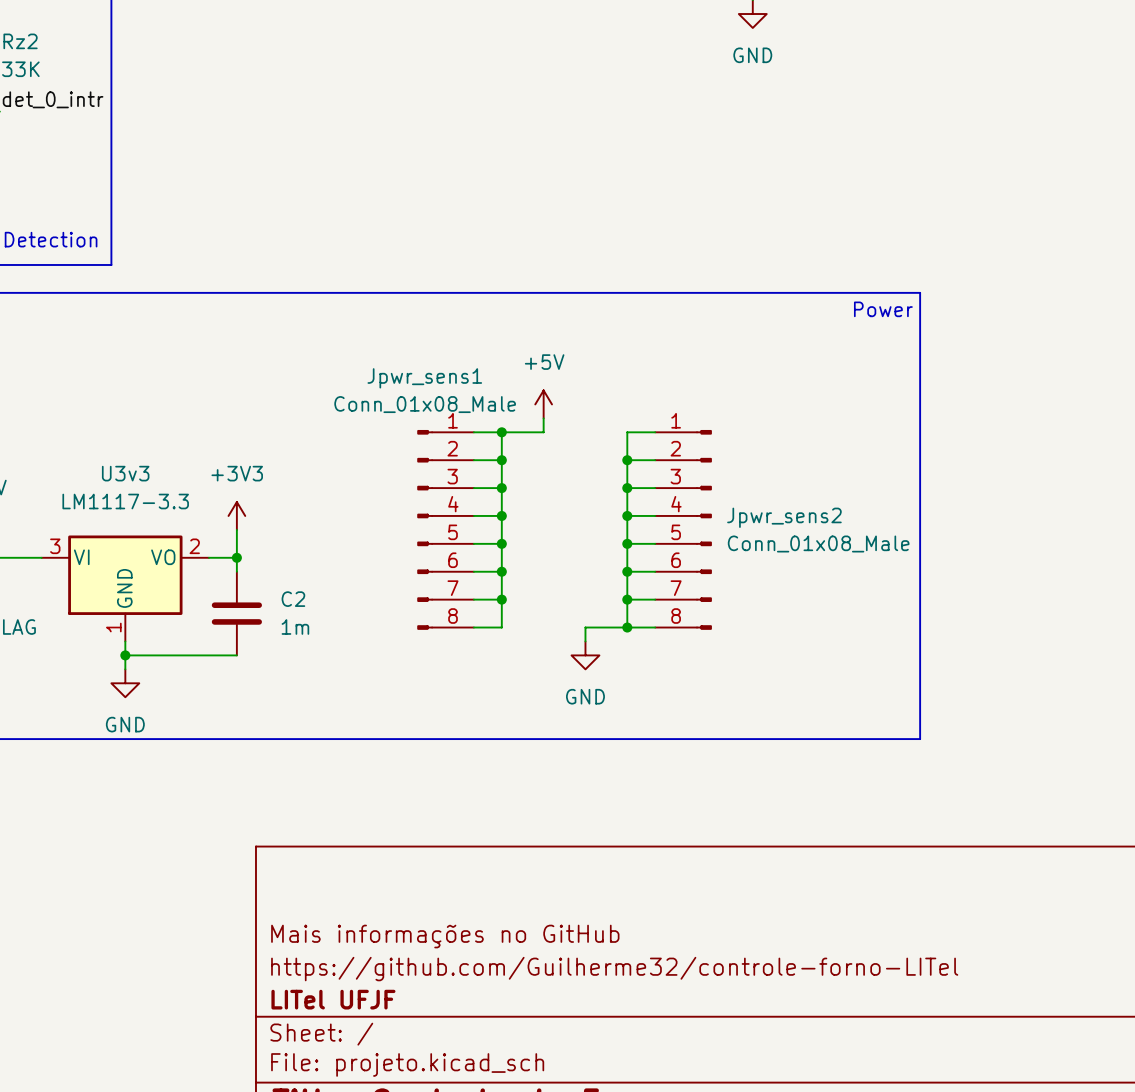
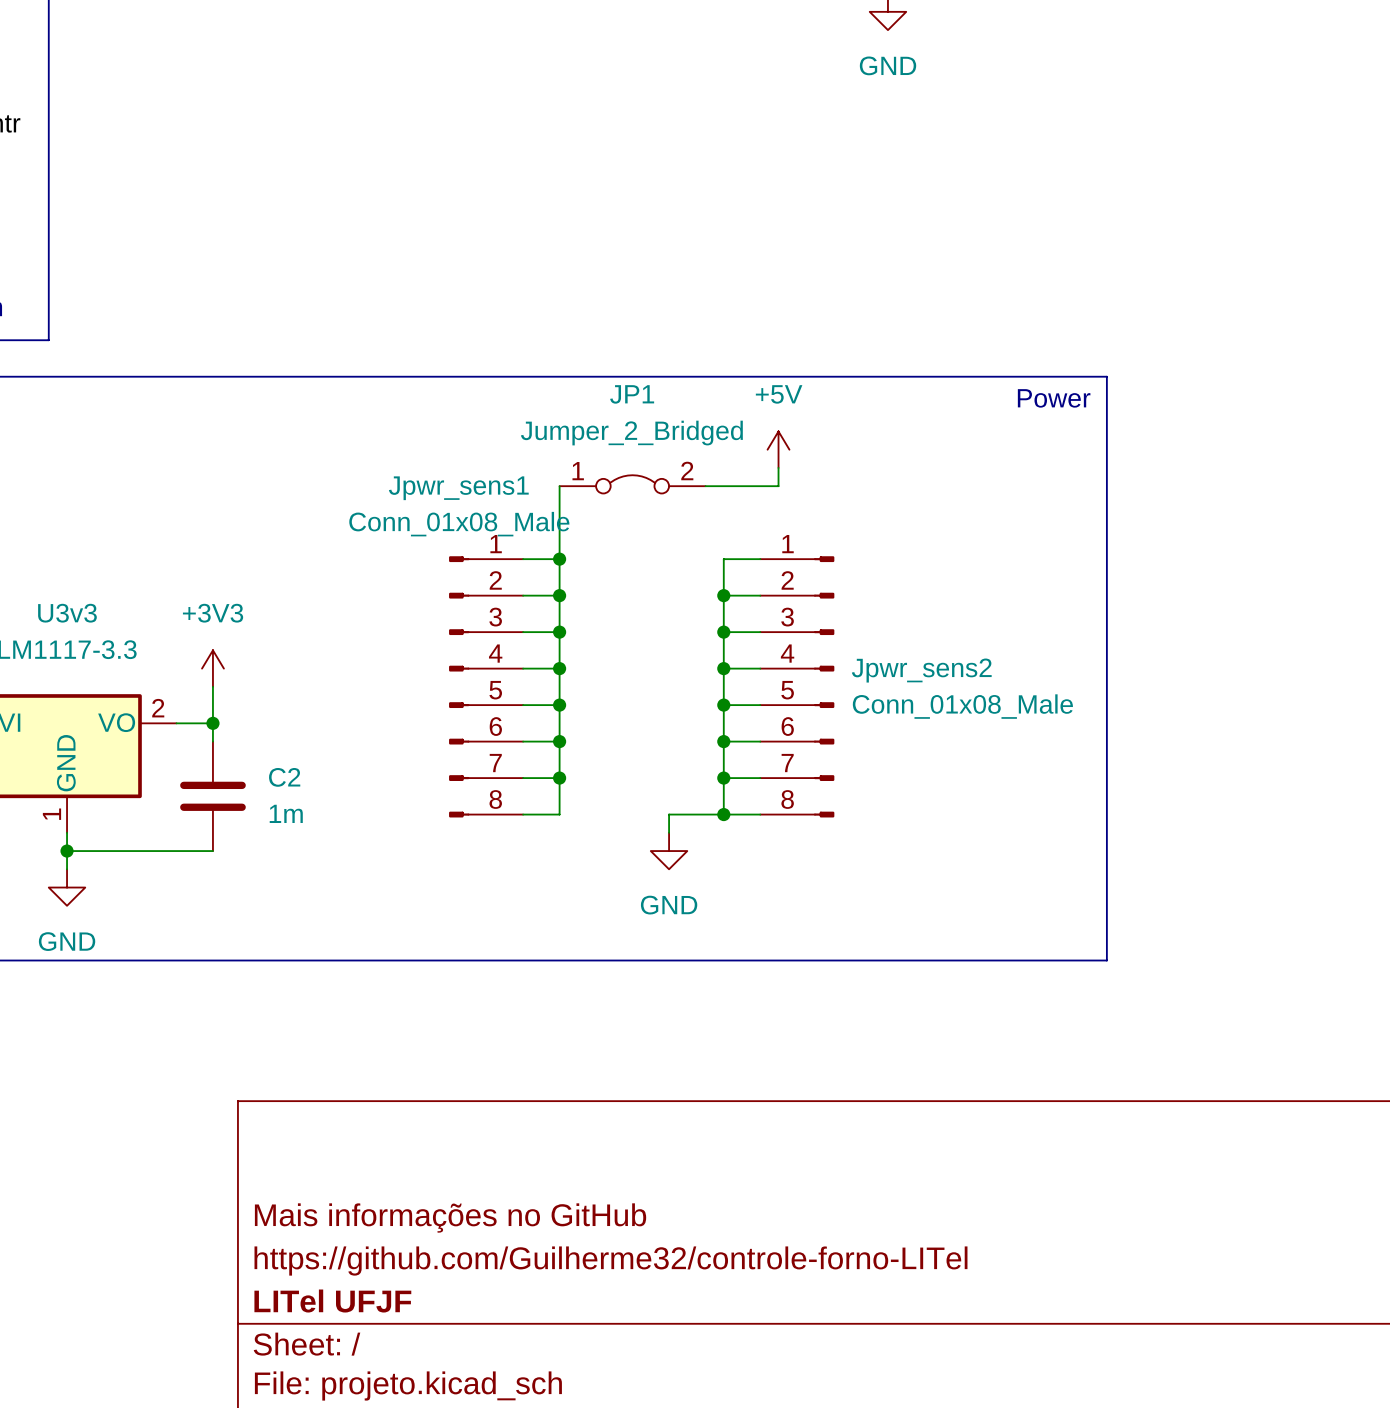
wire: none -> (778, 467) (778, 486) (705, 486)
JP1: none -> Jumper_2_Bridged (632, 484)
power symbol position: +5V (543, 404) -> +5V (778, 449)
wire: (543, 418) (543, 432) (501, 432) -> (559, 486) (559, 559)

